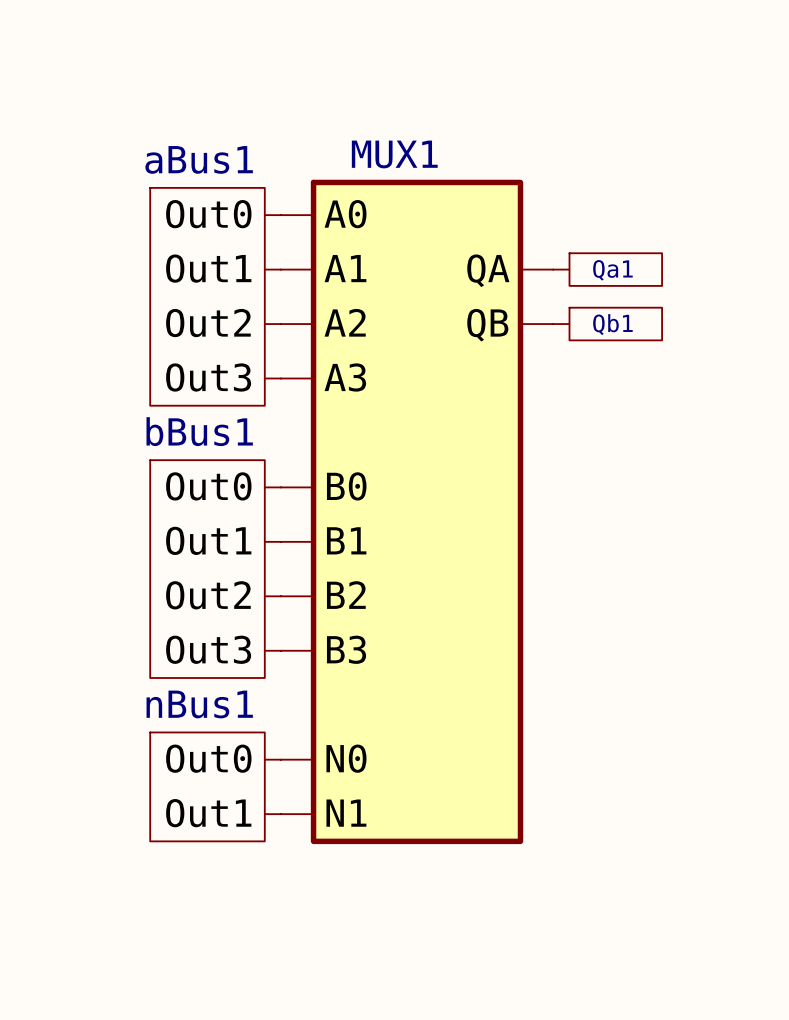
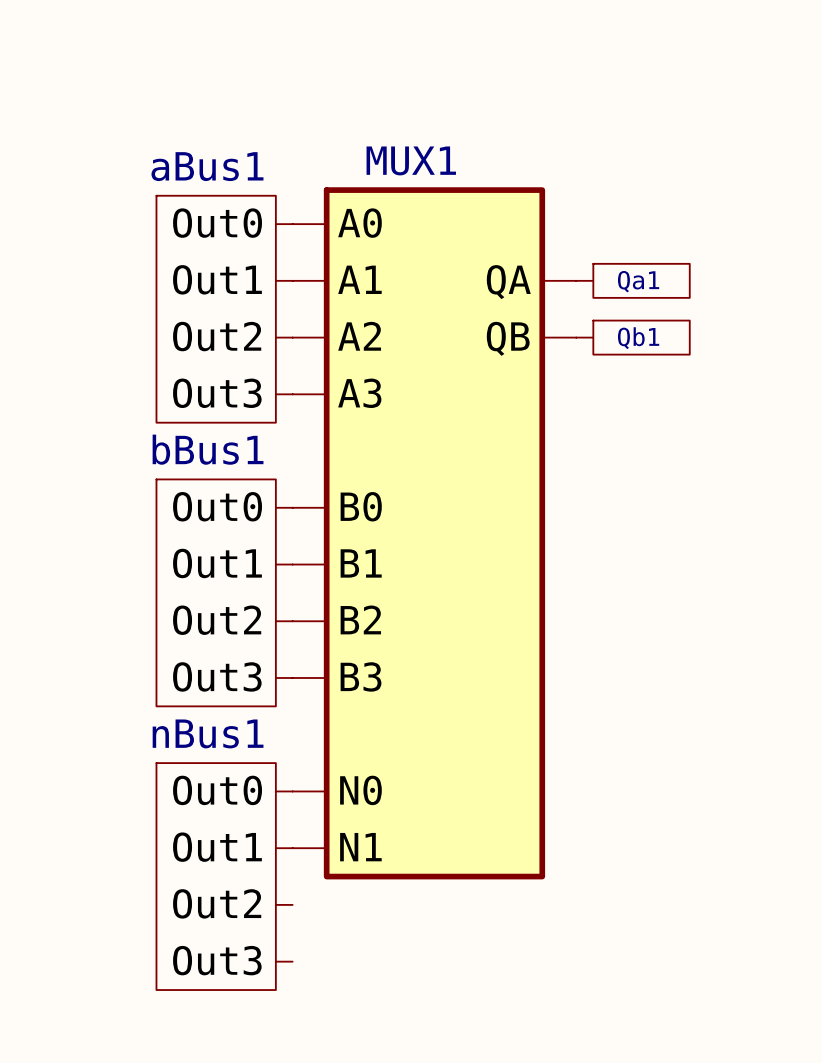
nBus1 symbol: [150, 732, 281, 842] -> [156, 763, 293, 991]

